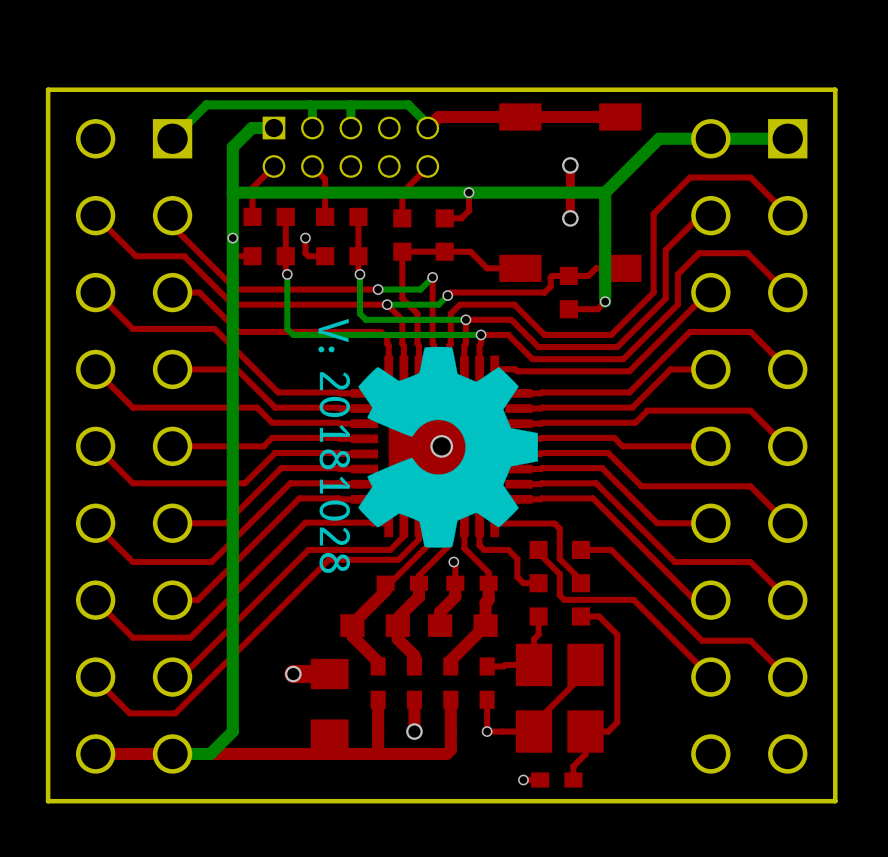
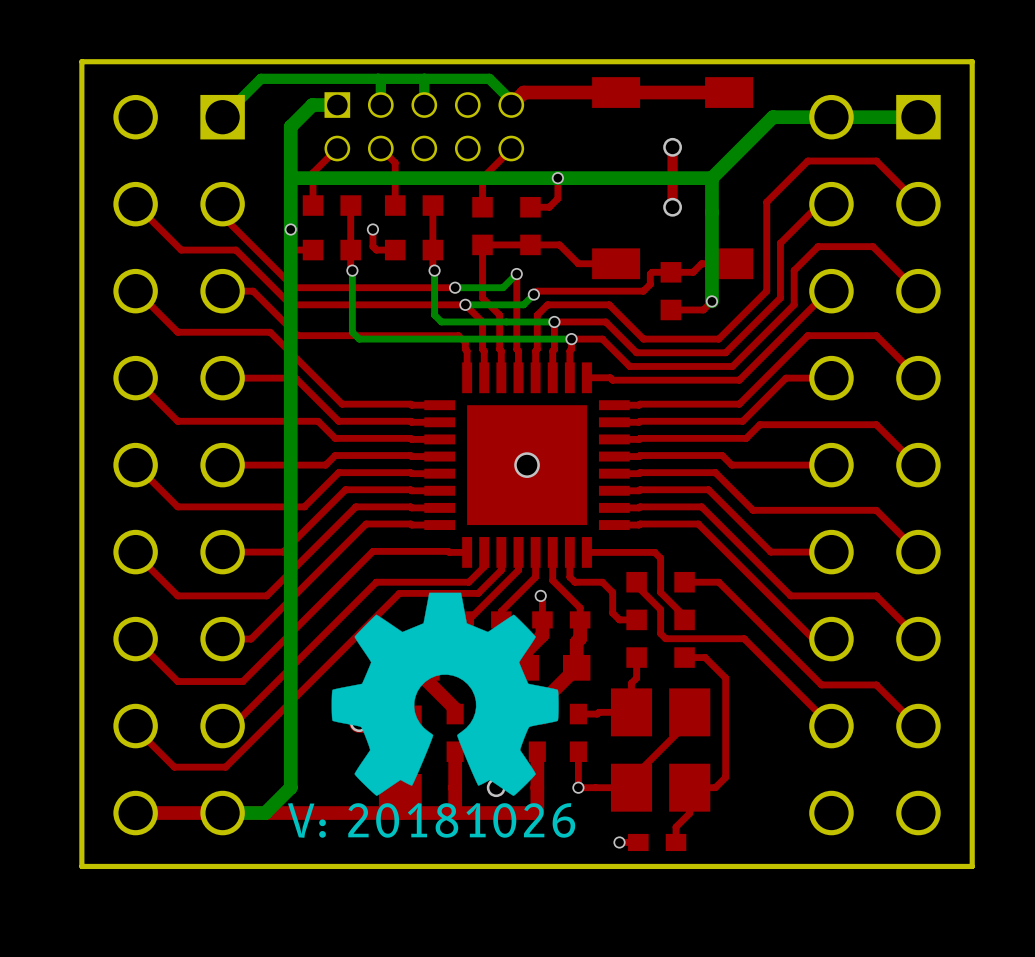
drawing: [358, 346, 539, 548] -> none
drawing: none -> [331, 592, 559, 796]

